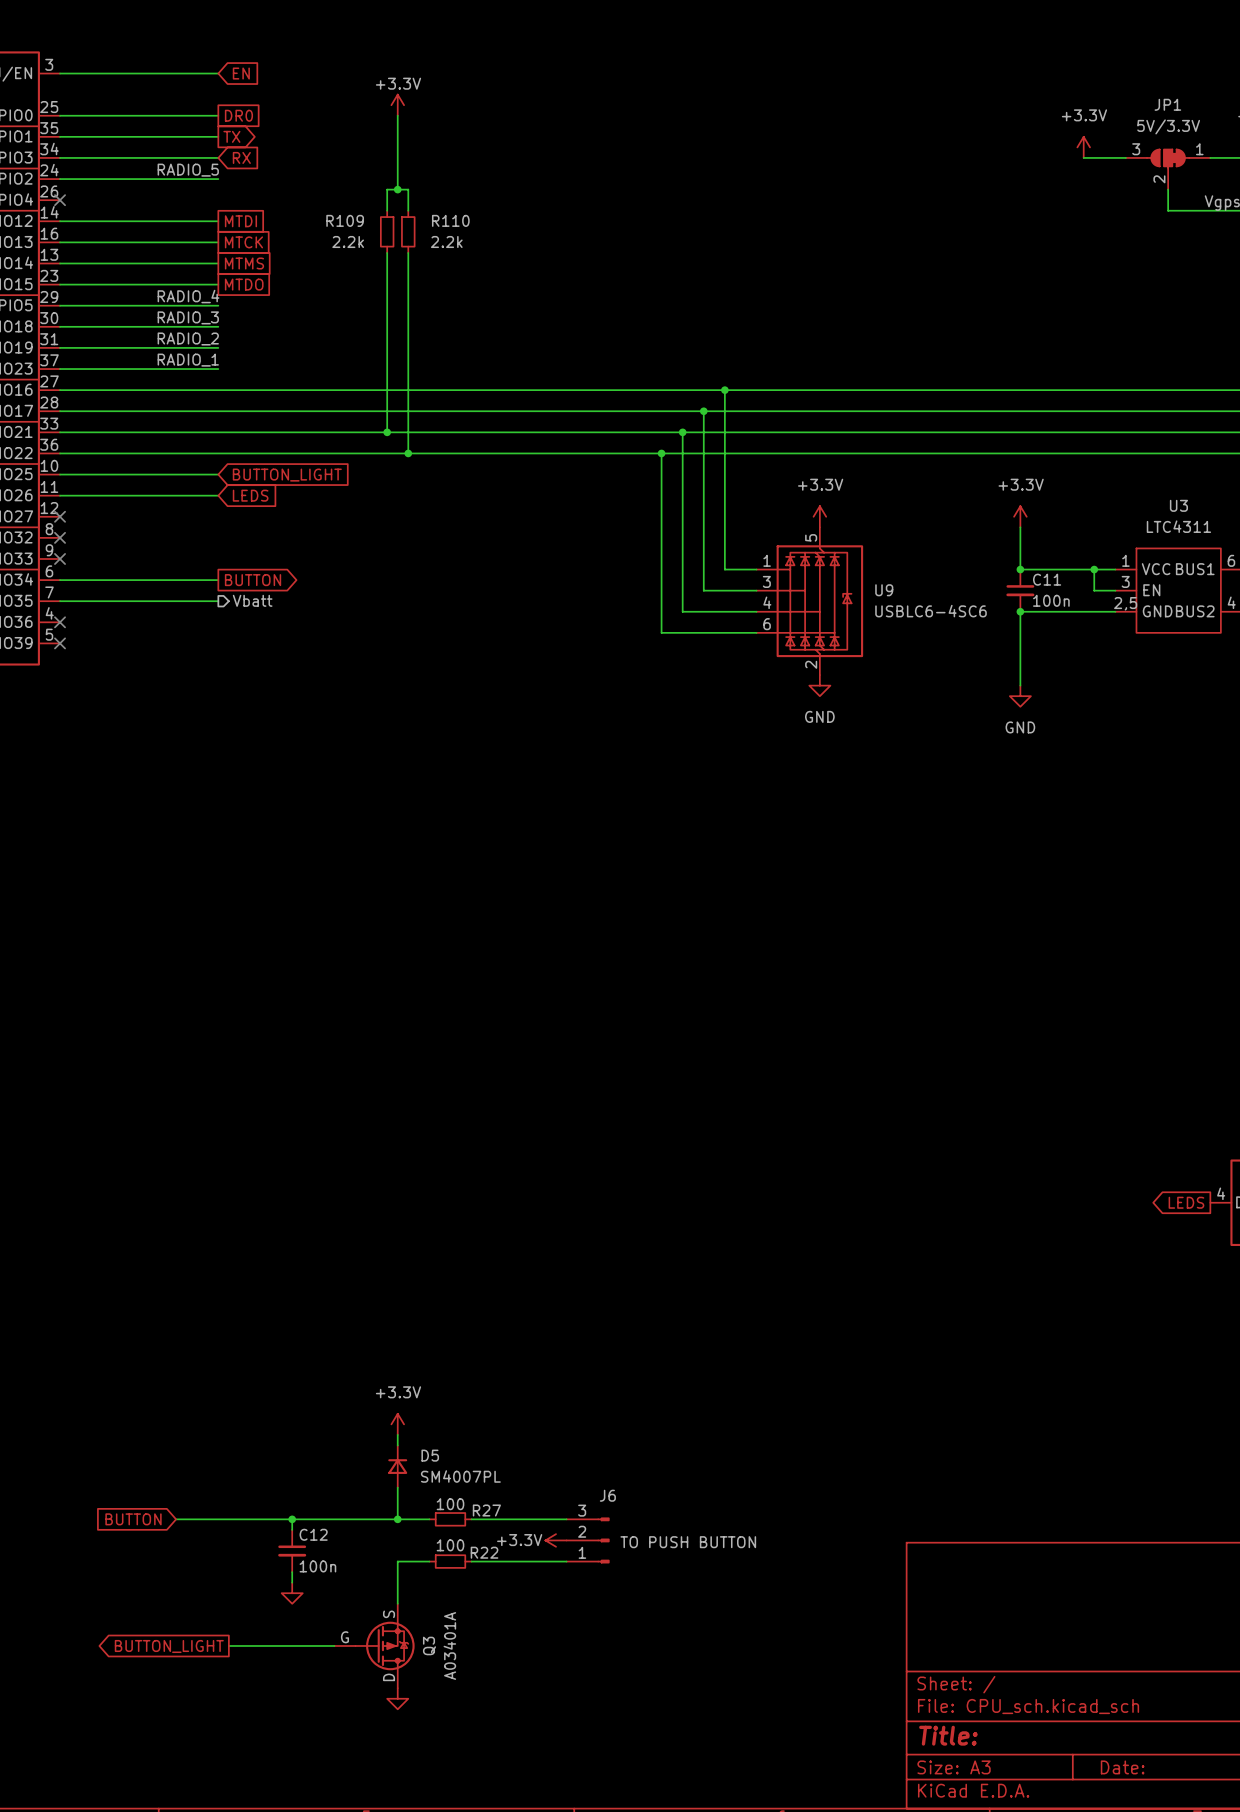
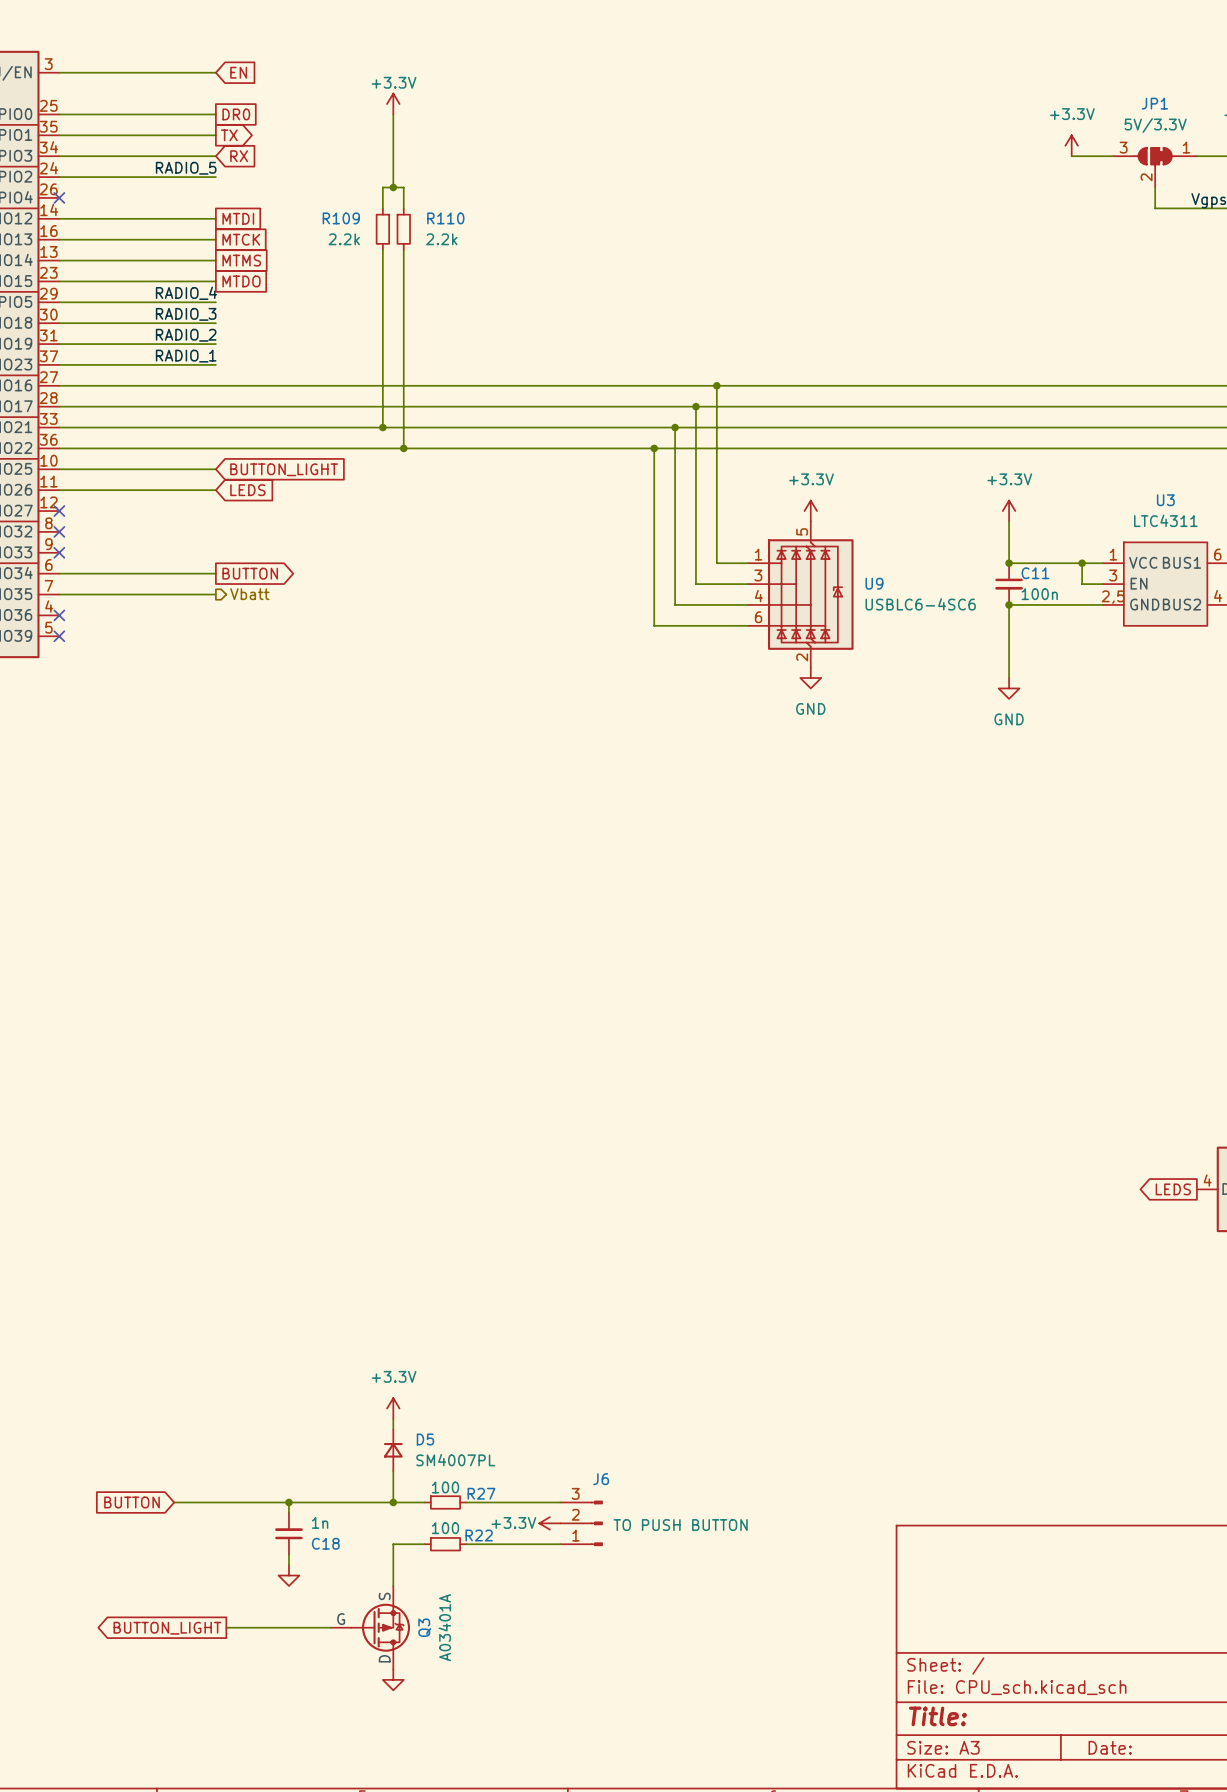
C12: 100n (292, 1551) -> none
C18: none -> 1n (288, 1533)

